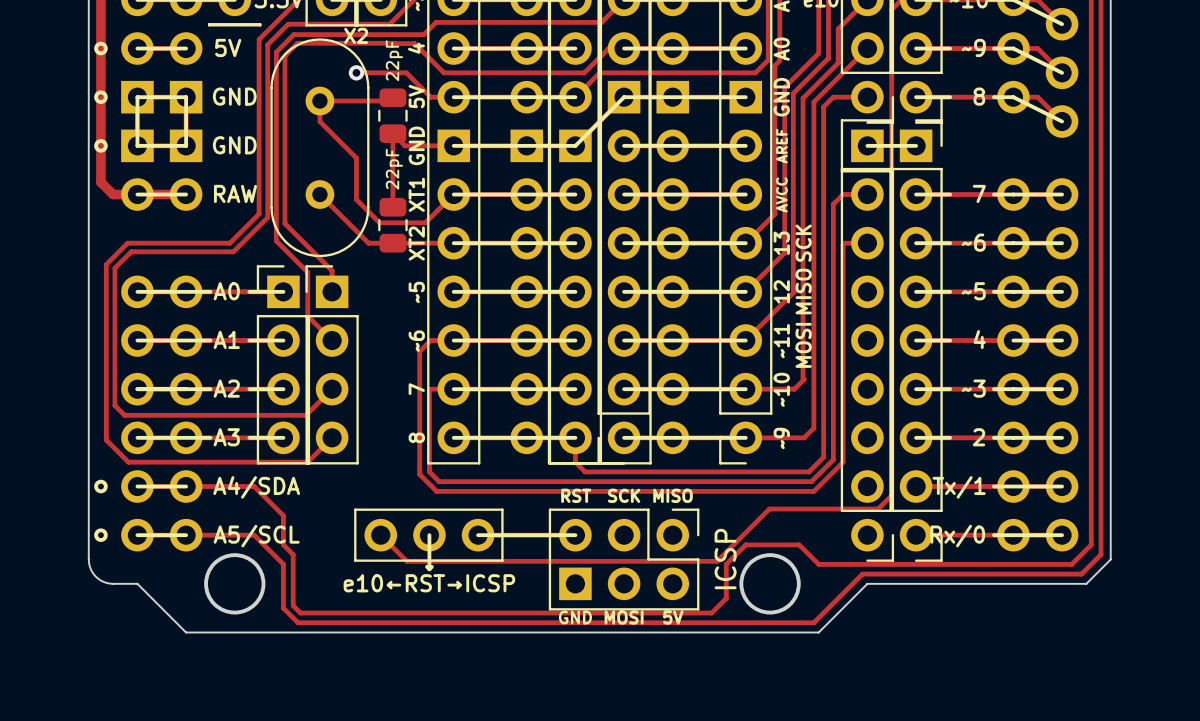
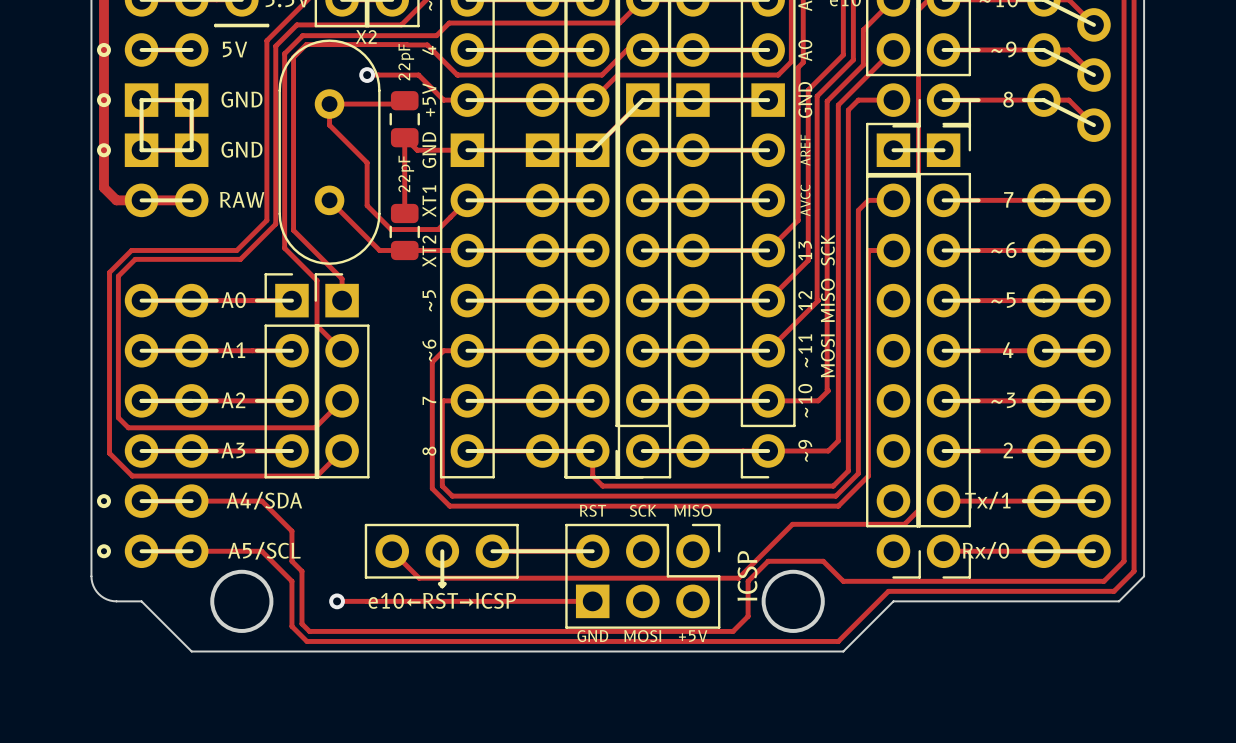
text: 5V (416, 96) -> +5V (429, 99)
track: none -> (337, 601) (592, 601)
via: none -> (337, 601)
text: 5V (673, 617) -> +5V (693, 636)

